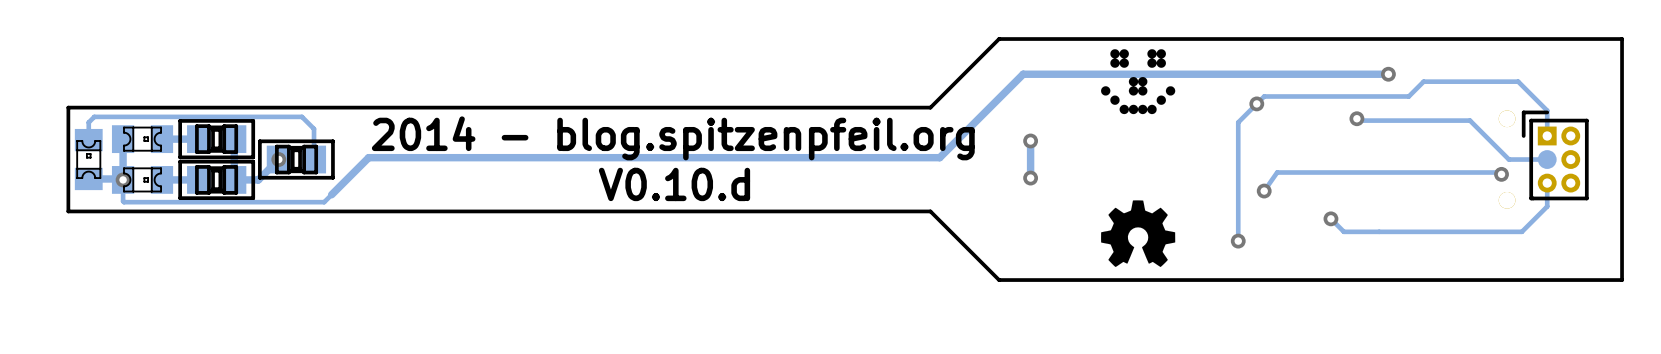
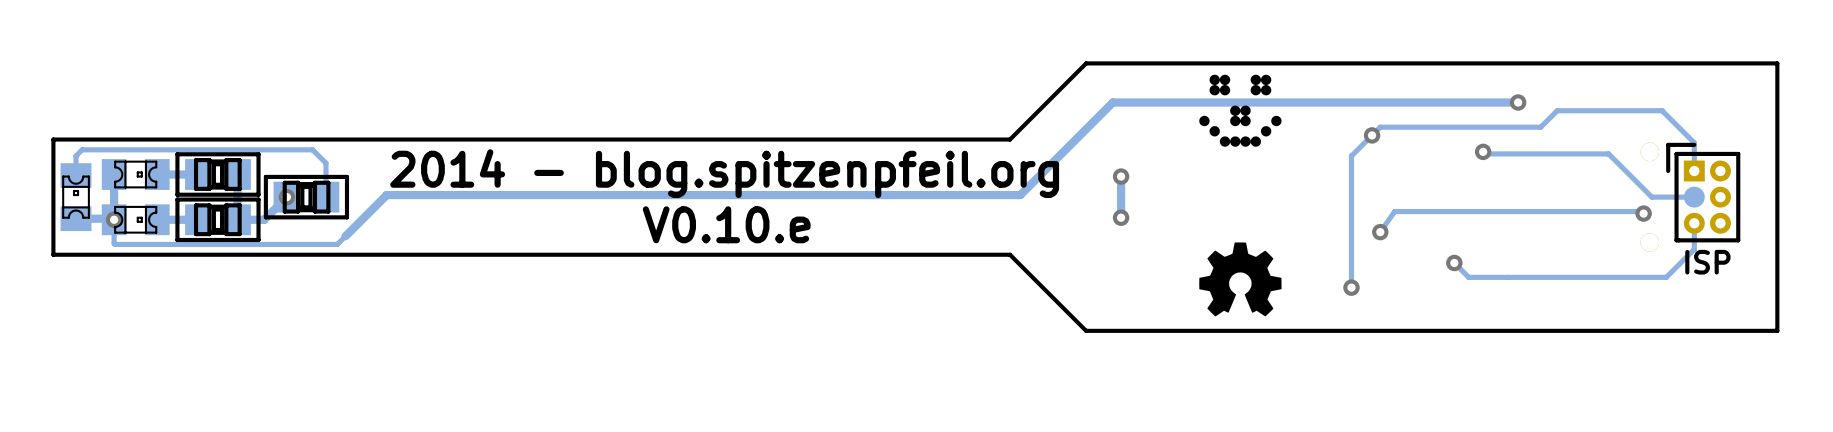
text: V0.10.d (674, 184) -> V0.10.e (726, 224)
part value: none -> ISP (1707, 262)

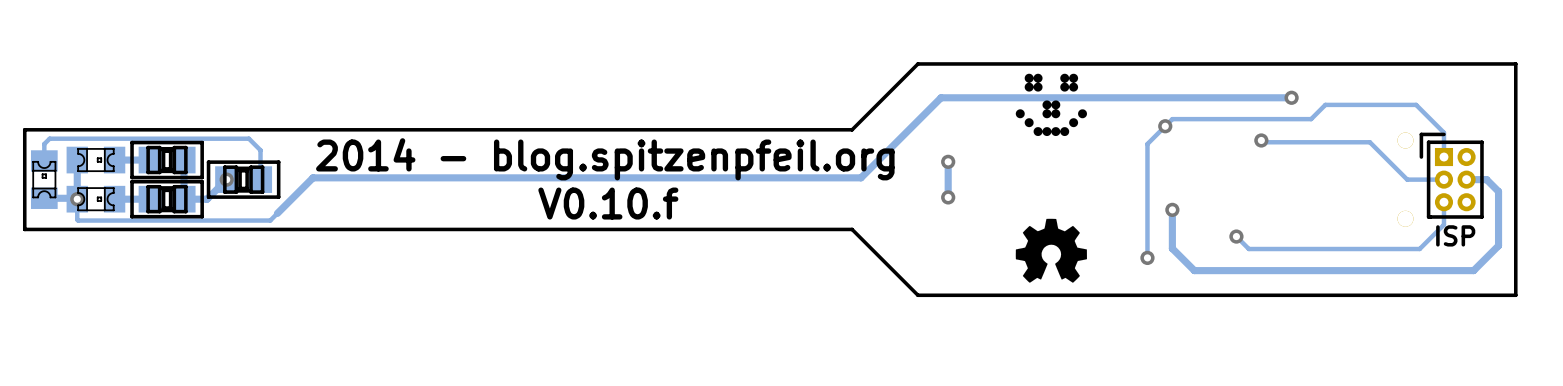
part footprint: [1666, 142, 1741, 243] -> [1419, 132, 1484, 219]
track: (1643, 213) (1641, 211) (1394, 211) (1380, 232) -> (1466, 179) (1486, 179) (1498, 191) (1498, 245) (1473, 270) (1194, 270) (1172, 248) (1172, 209)
via: (1643, 213) -> none
text: V0.10.e (726, 224) -> V0.10.f (608, 203)

